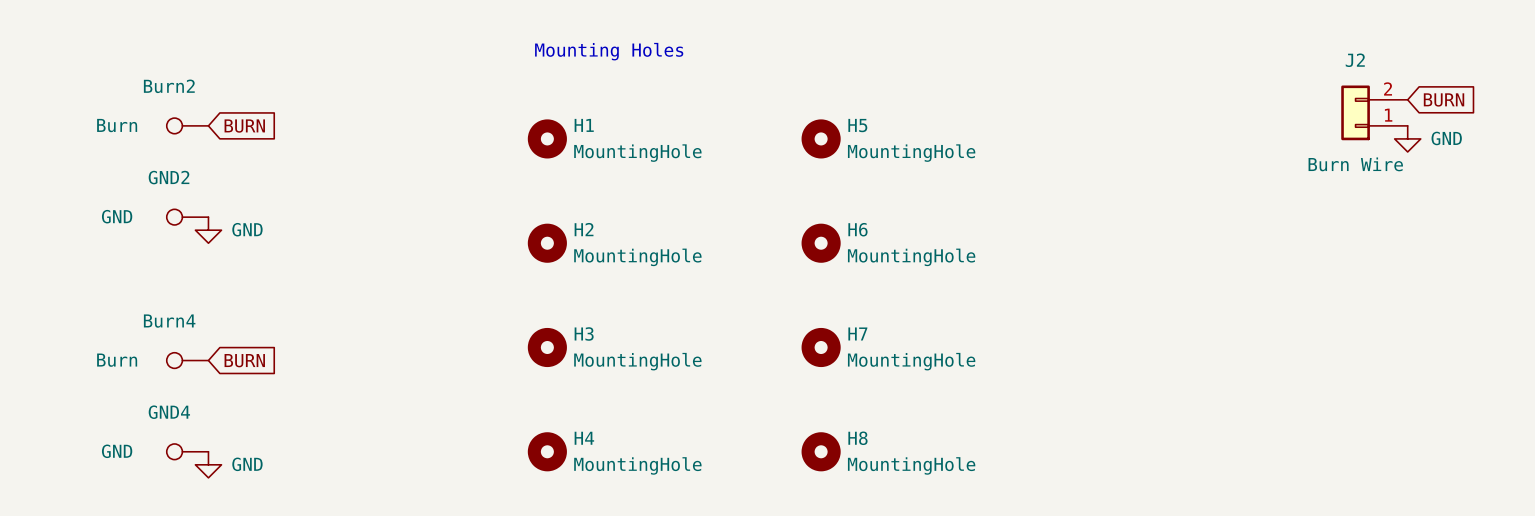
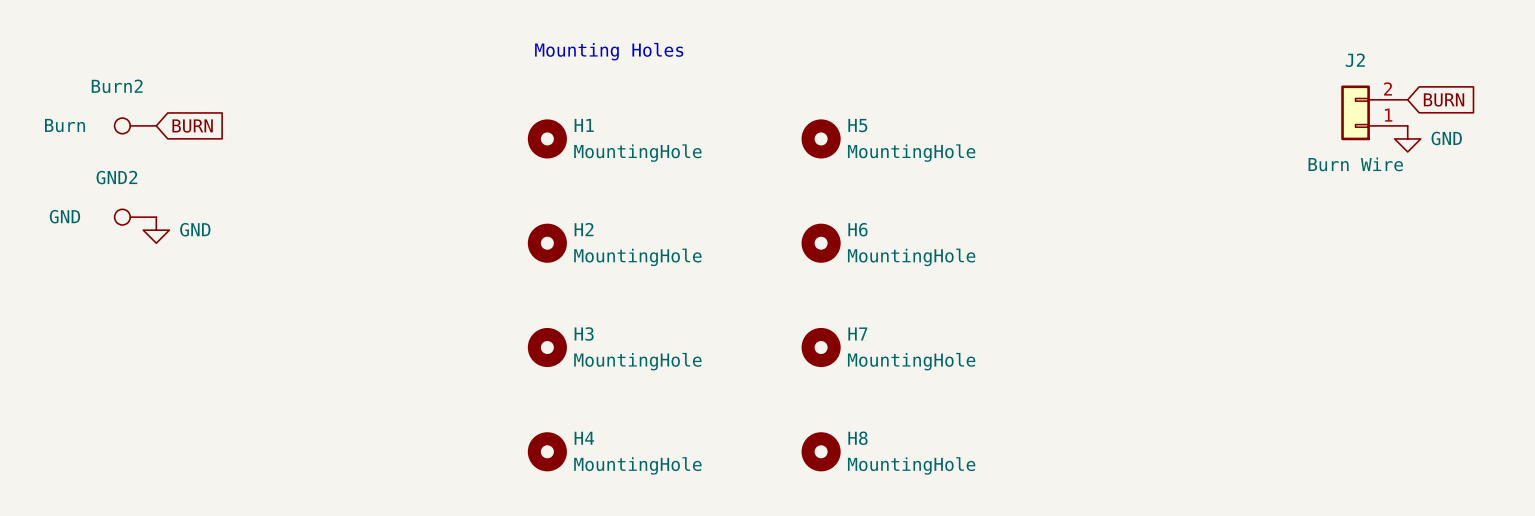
Burn2 position: (187, 125) -> (135, 125)
global label position: BURN (244, 126) -> BURN (192, 126)
GND2 position: (187, 217) -> (135, 217)
power symbol position: GND (208, 230) -> GND (156, 230)
Burn4: Burn (187, 360) -> none
global label: BURN (244, 360) -> none
GND4: GND (187, 451) -> none
power symbol: GND (208, 464) -> none

